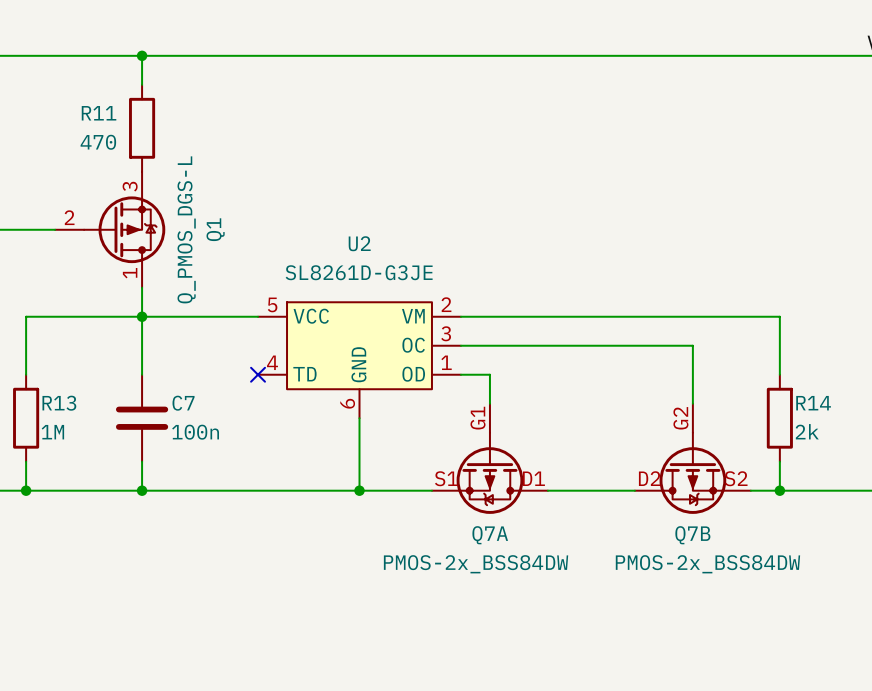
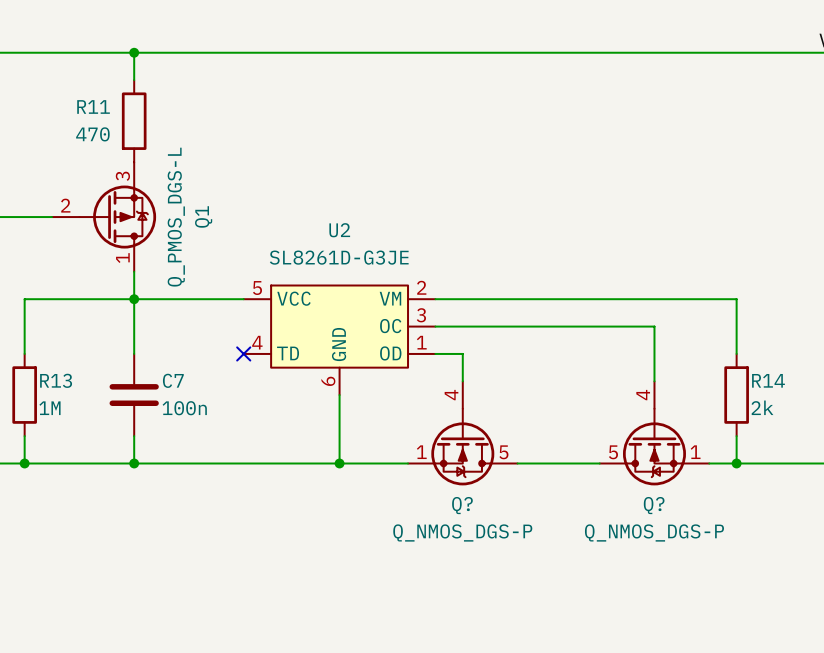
Q7A: PMOS-2x_BSS84DW (489, 458) -> none
Q?: none -> Q_NMOS_DGS-P (462, 433)
Q7B: PMOS-2x_BSS84DW (692, 458) -> none
Q?: none -> Q_NMOS_DGS-P (654, 433)

